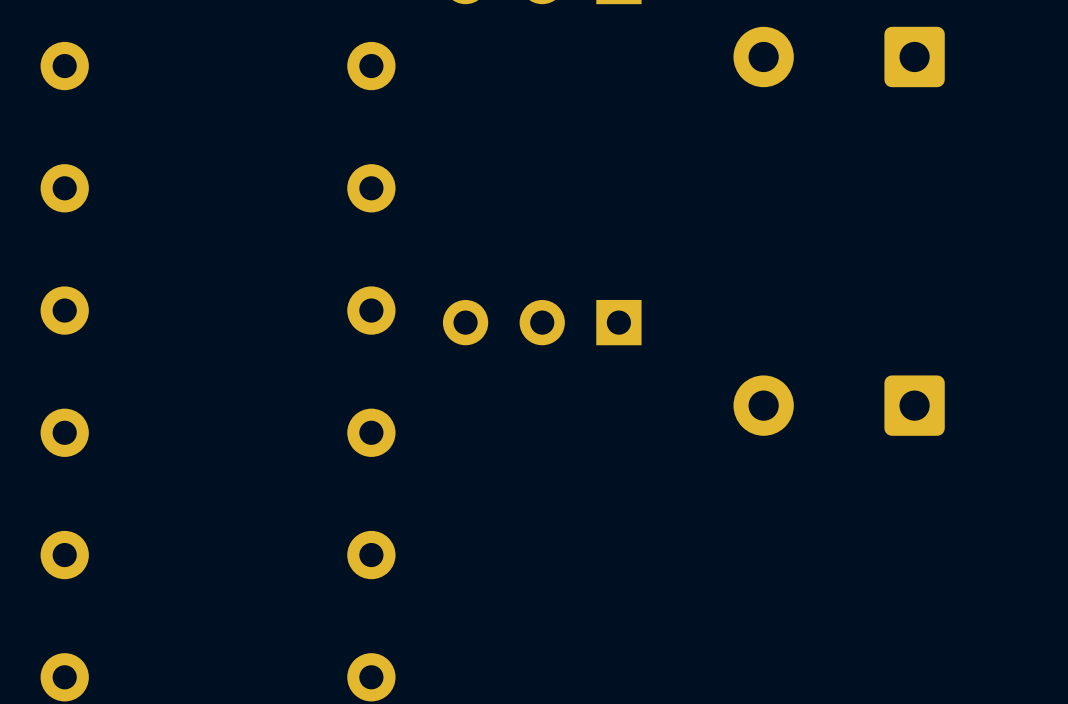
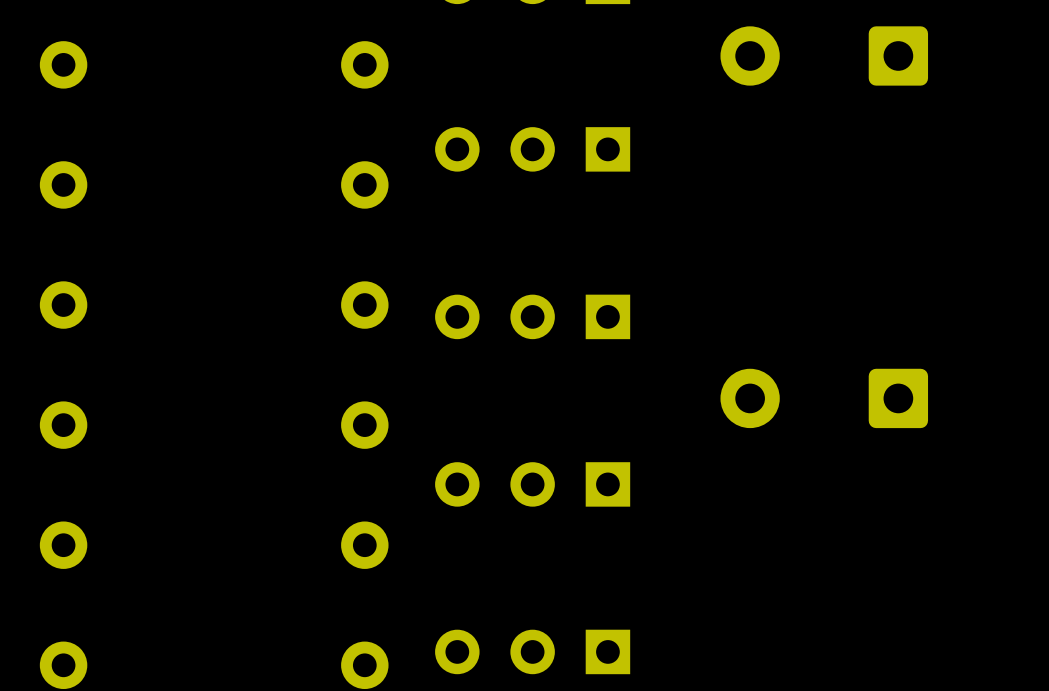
part: none -> (532, 149)
part: none -> (532, 484)
part: none -> (532, 651)

